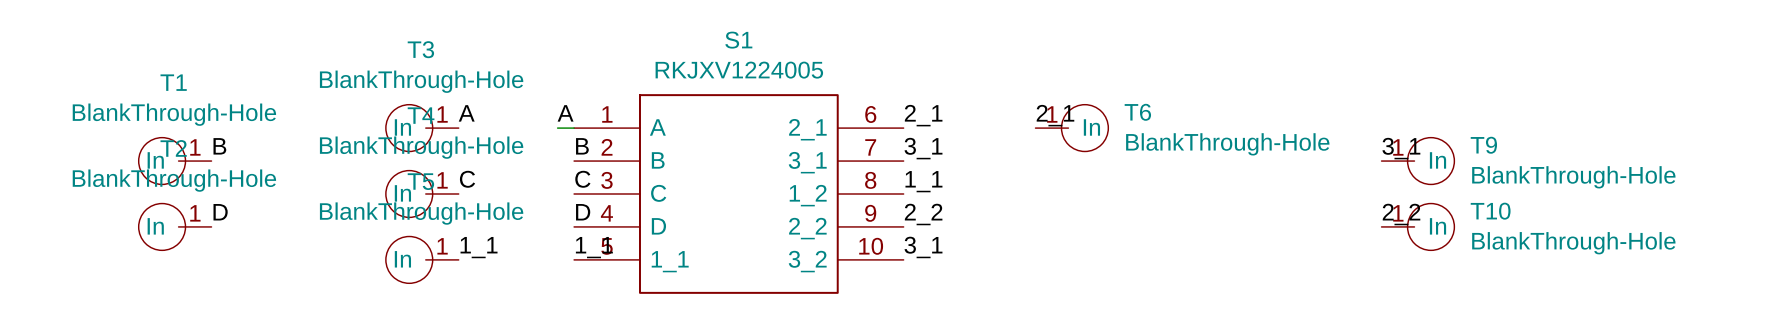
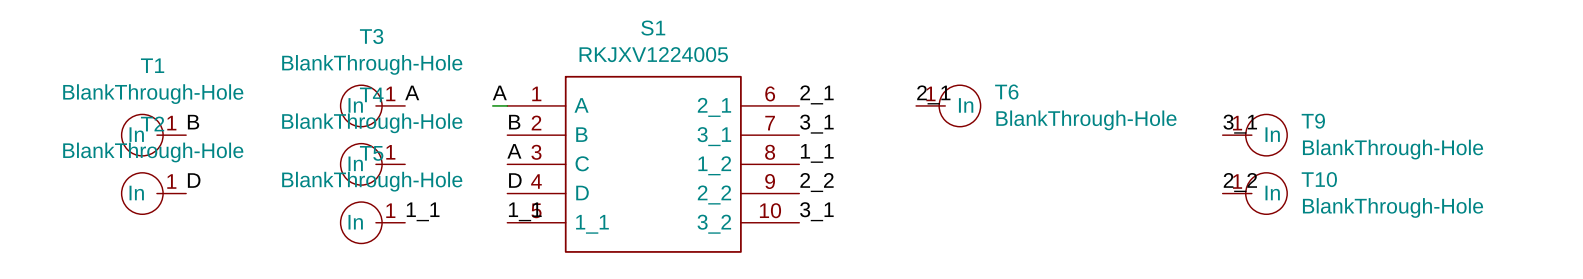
label: C (467, 179) -> none
label: C (582, 179) -> A (514, 151)

